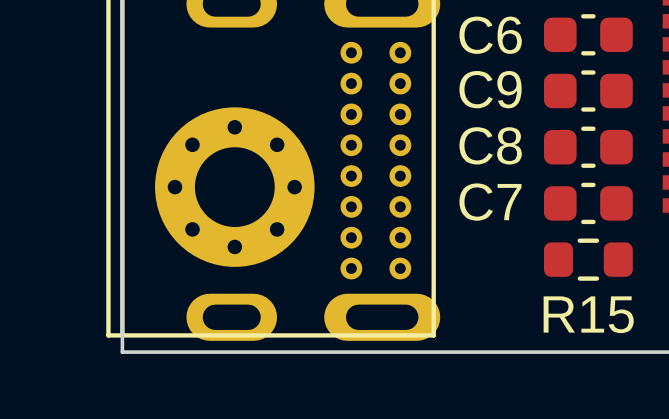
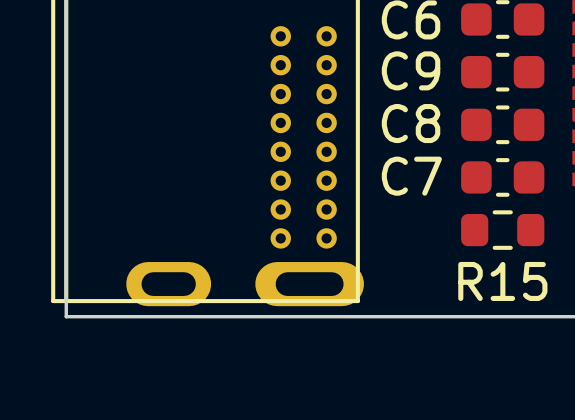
part: (234, 187) -> none

